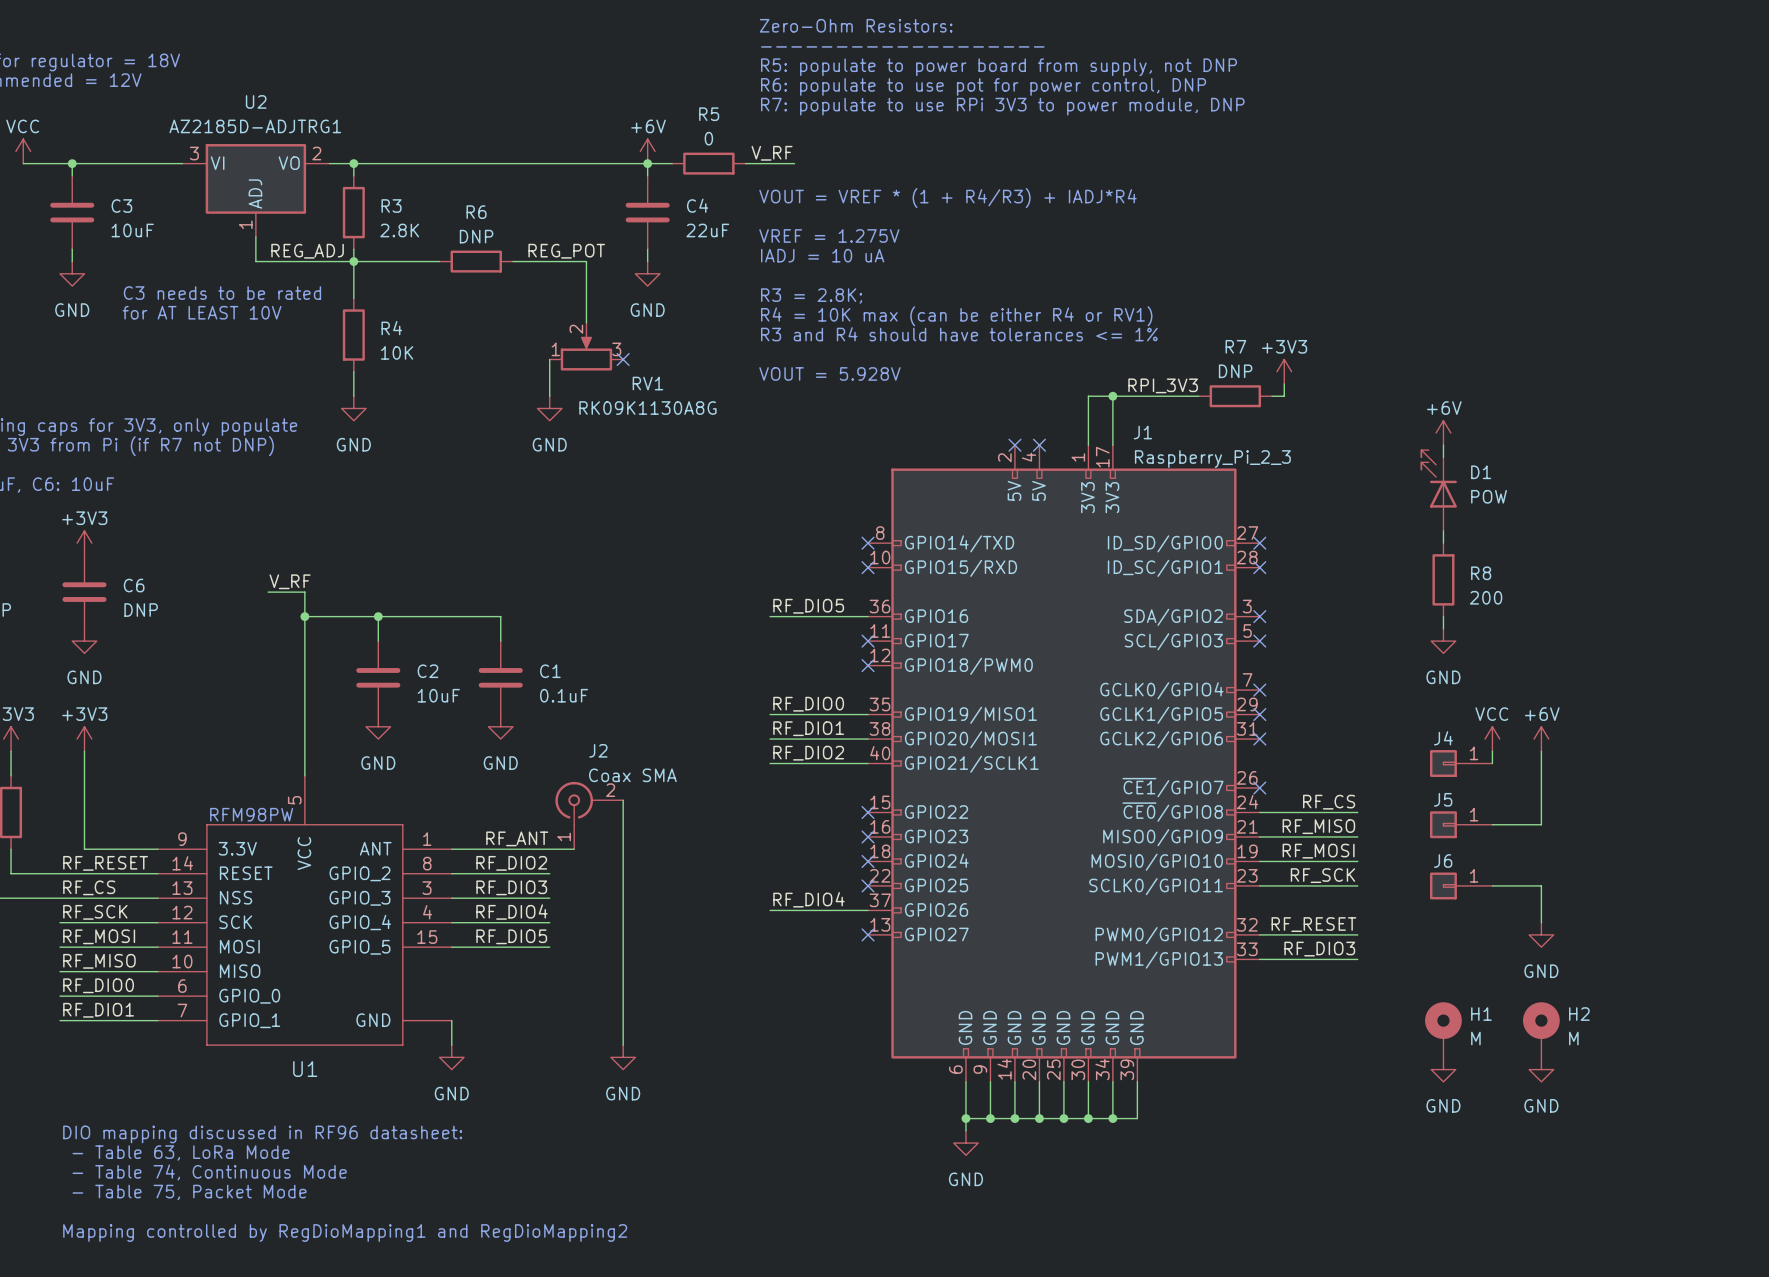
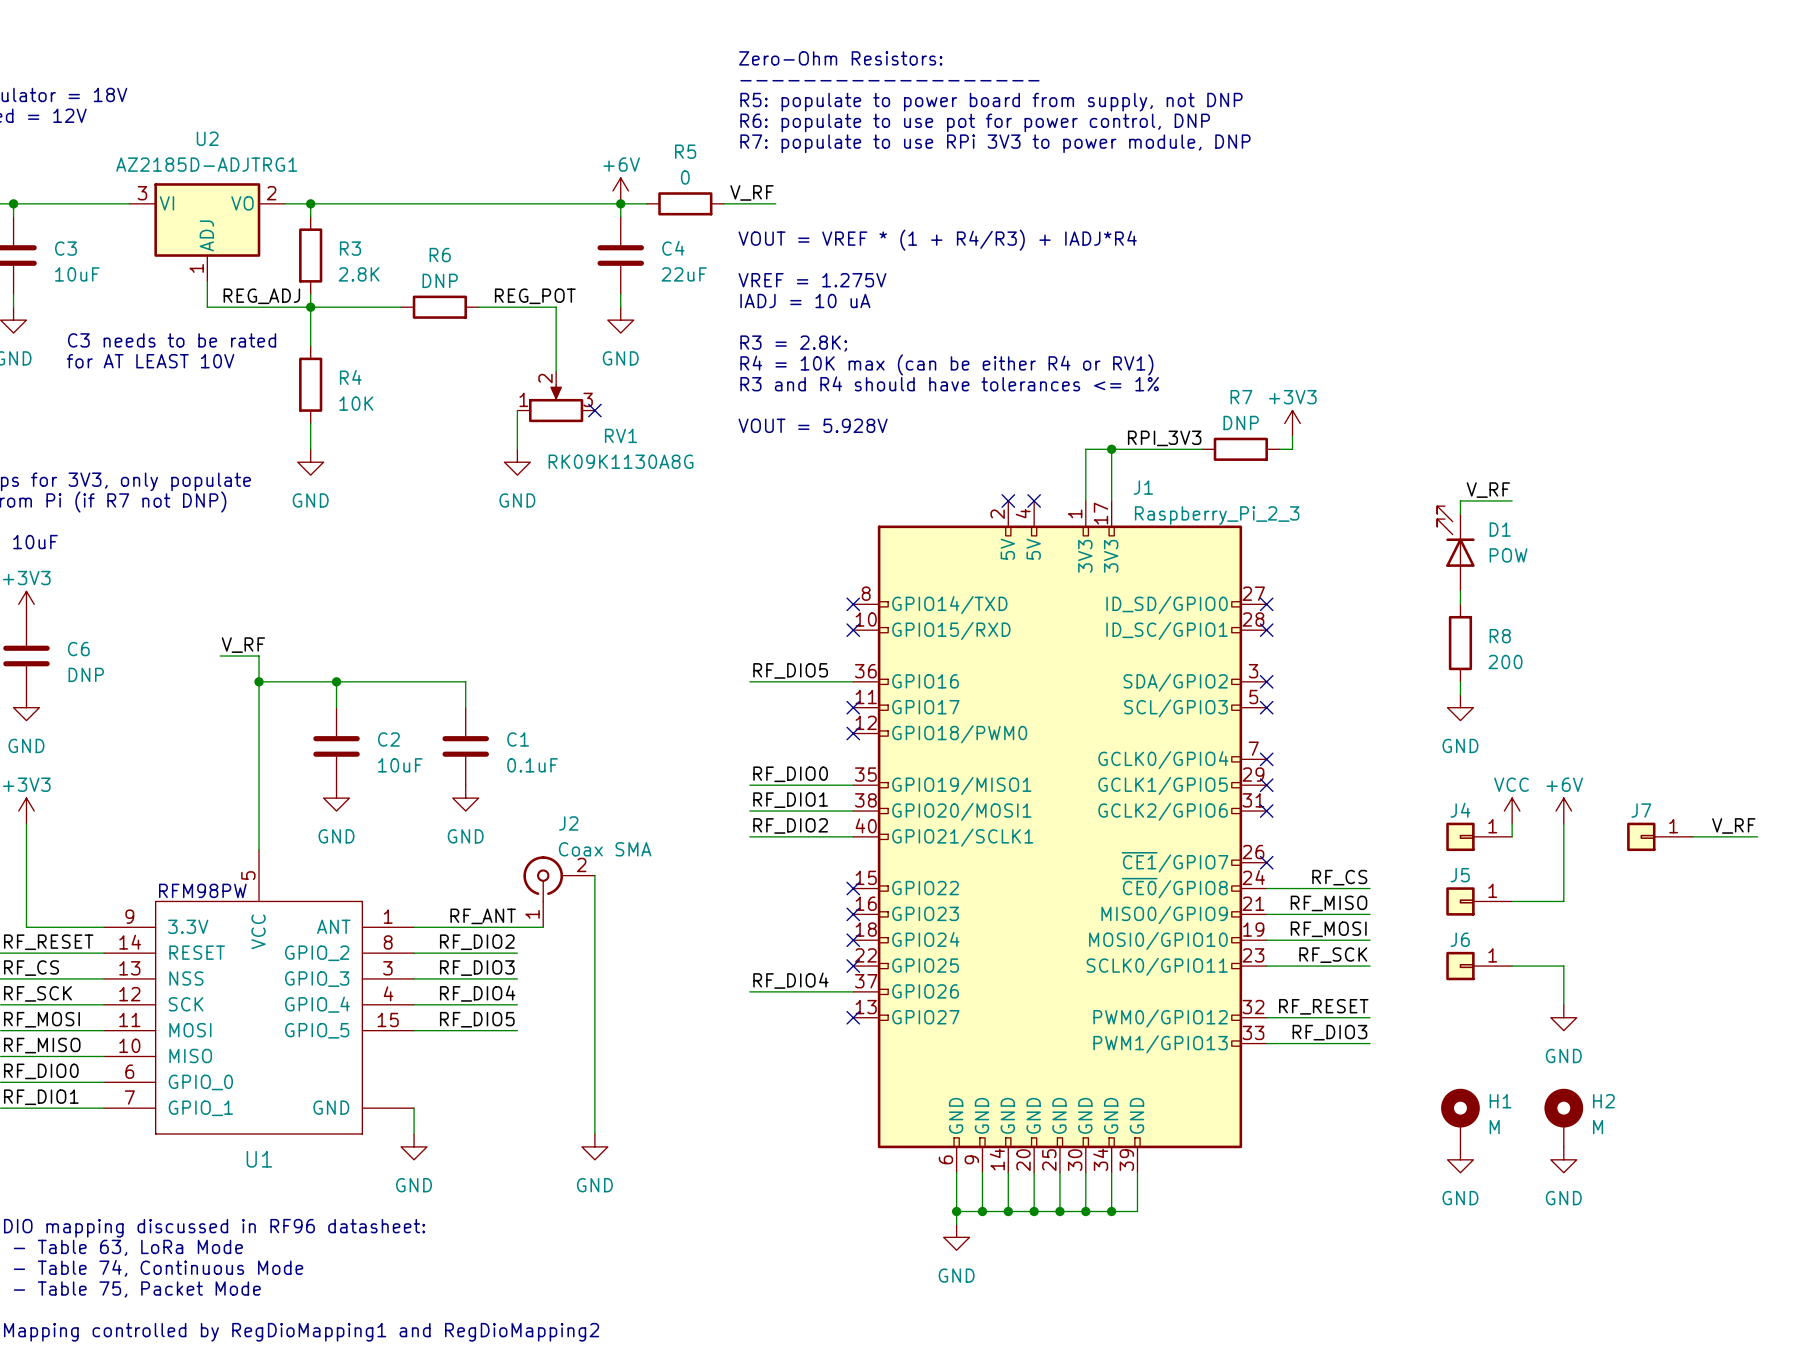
power symbol: +6V (1443, 432) -> none
label: none -> V_RF (1488, 490)
wire: none -> (1460, 500) (1512, 500)
label: none -> V_RF (1733, 825)
J7: none -> (1660, 836)
wire: none -> (1692, 836) (1757, 836)

